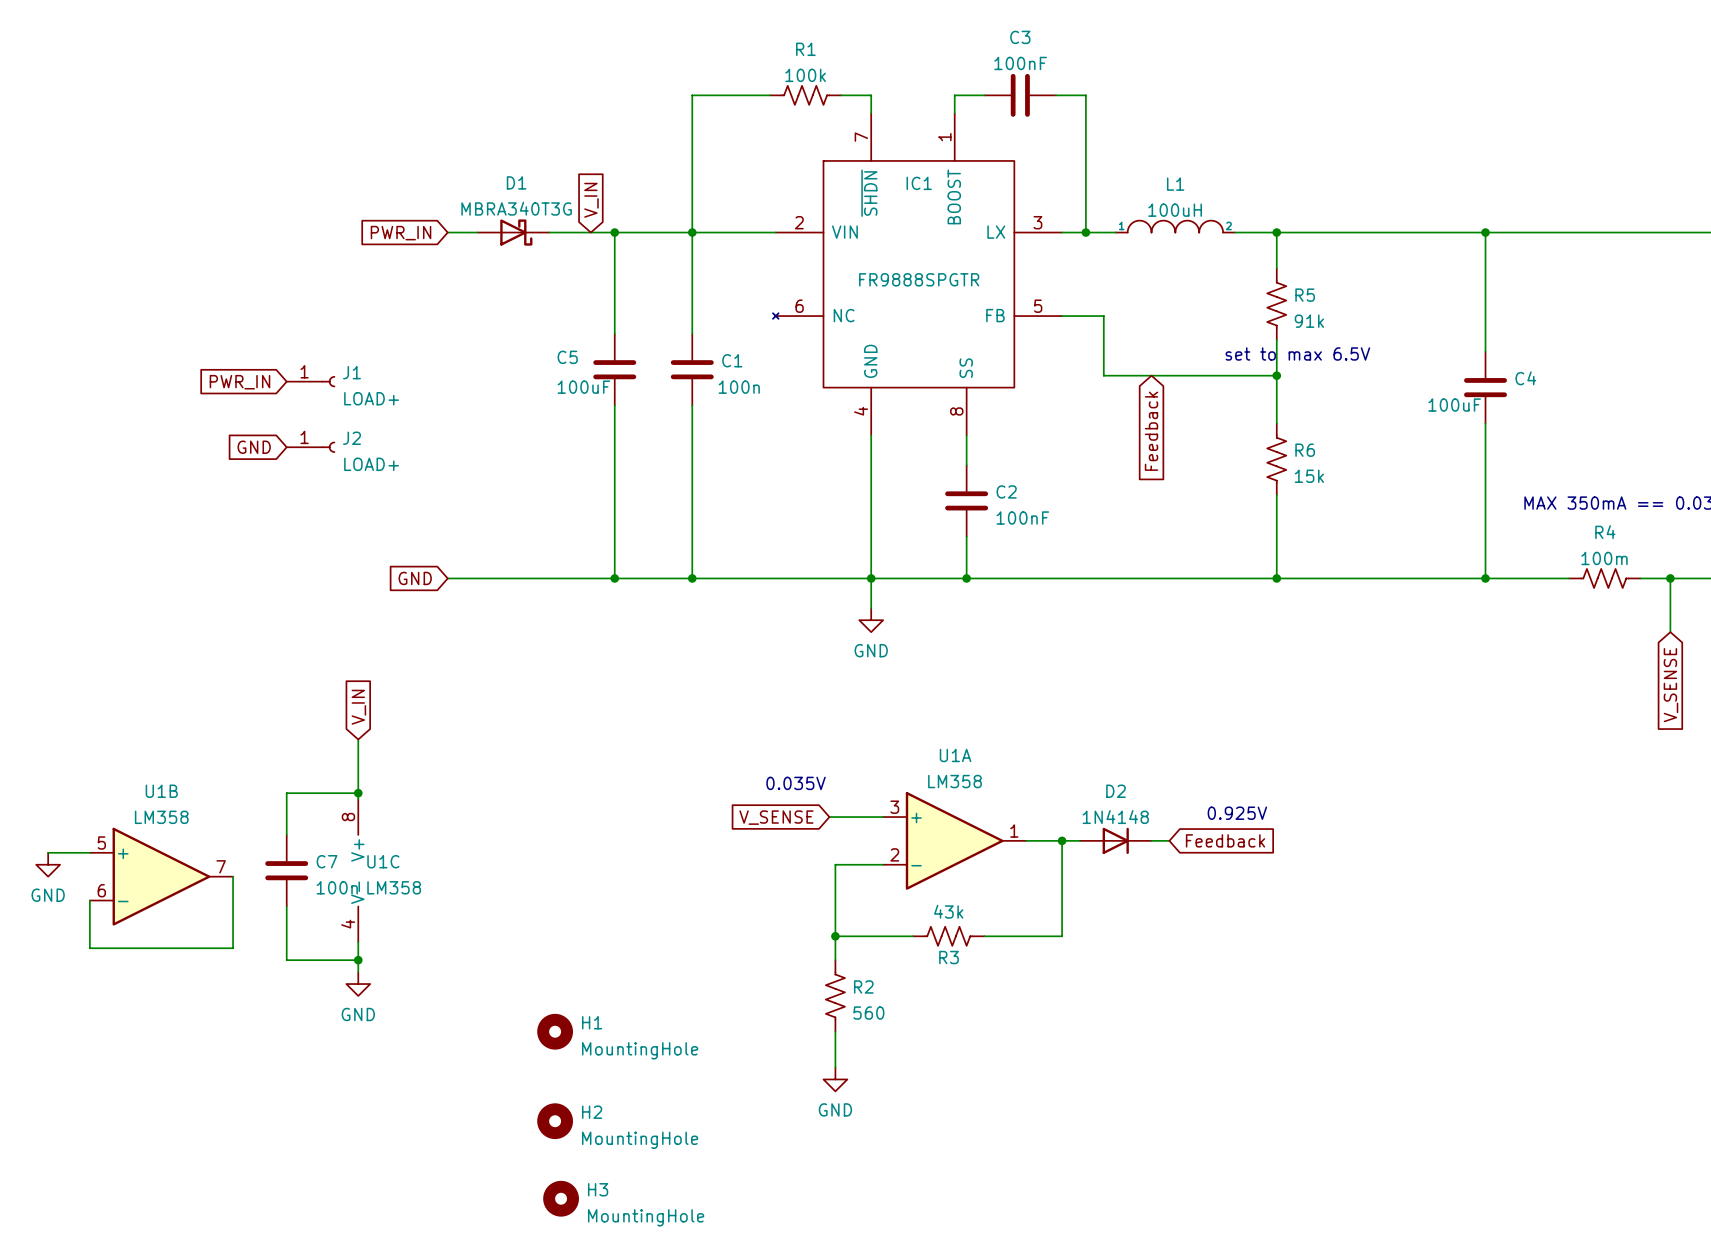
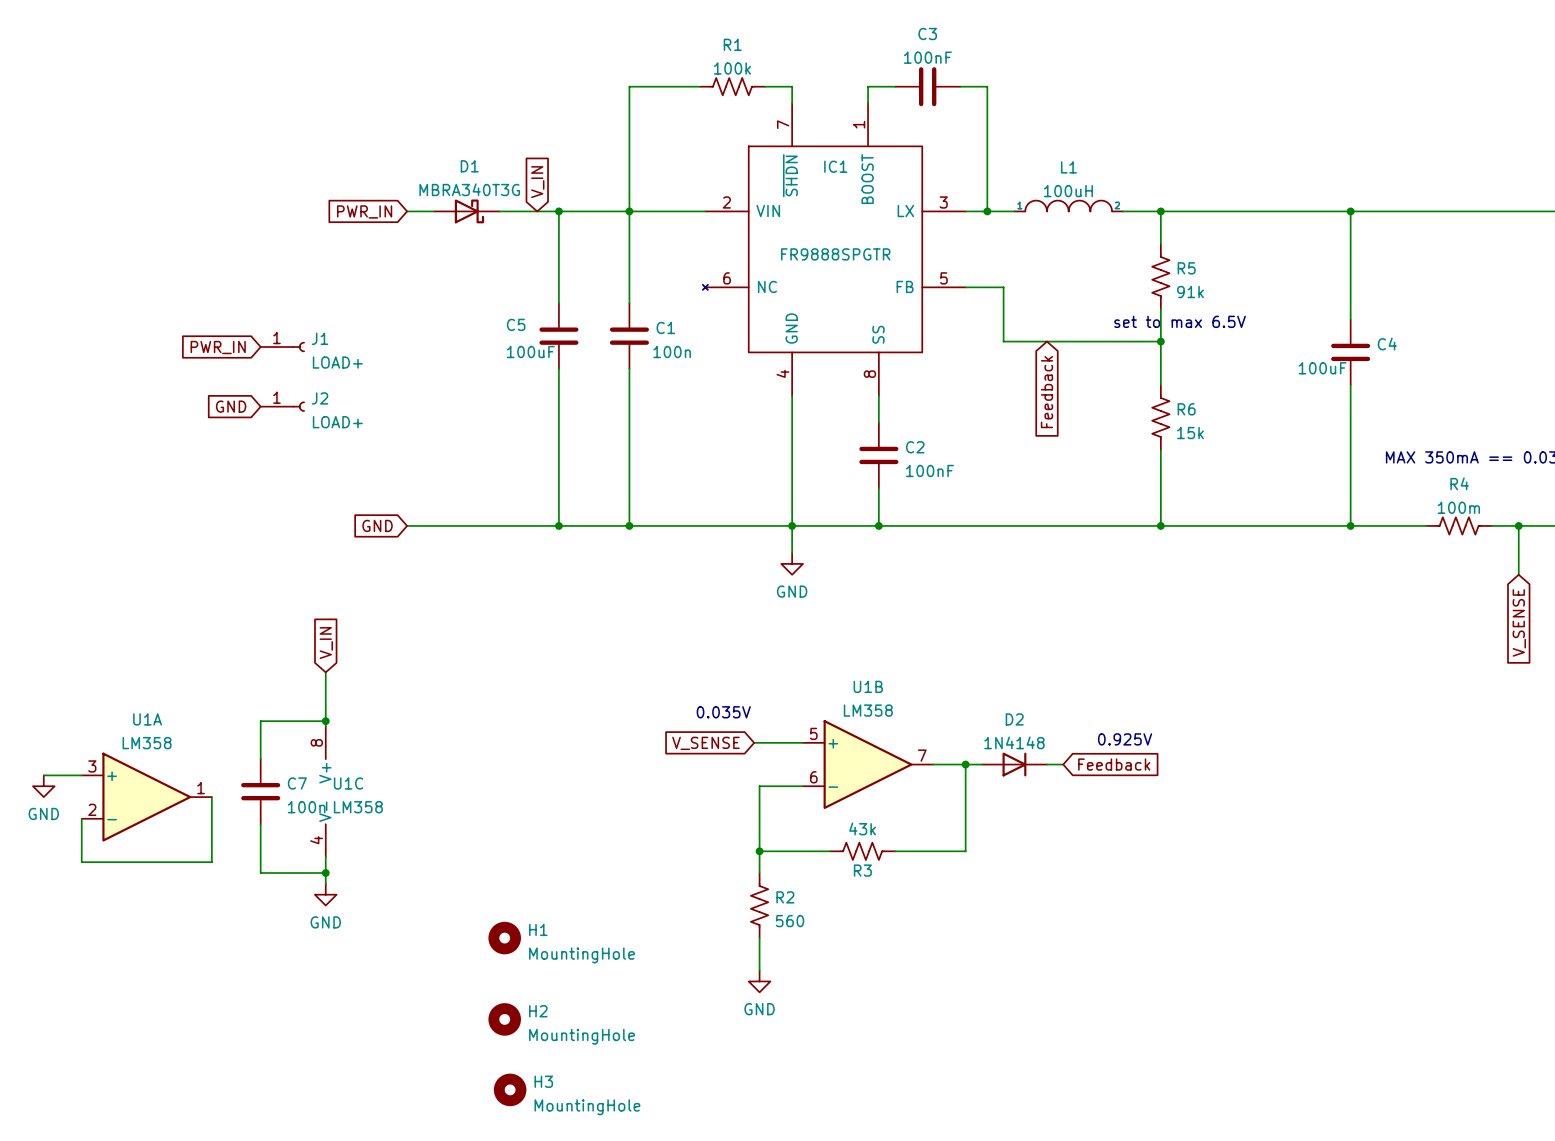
U1A position: (954, 840) -> (146, 797)
U1B position: (161, 876) -> (868, 764)

